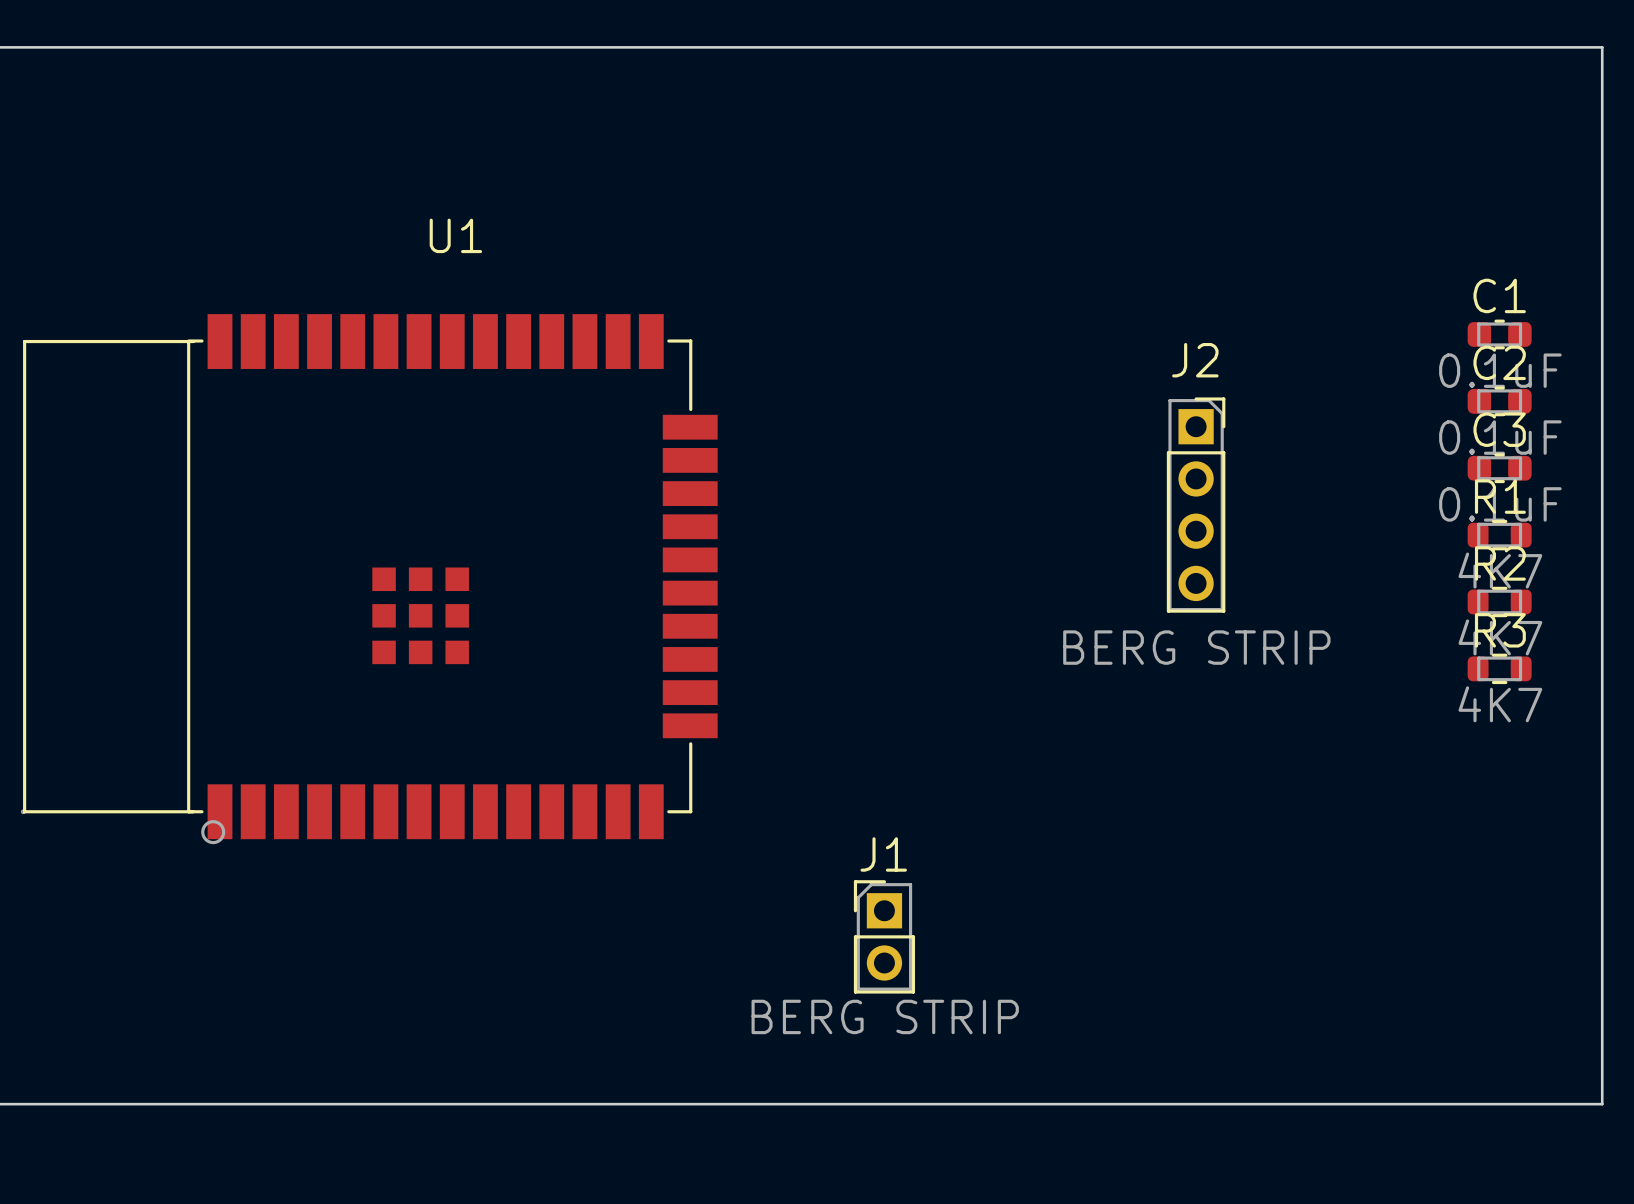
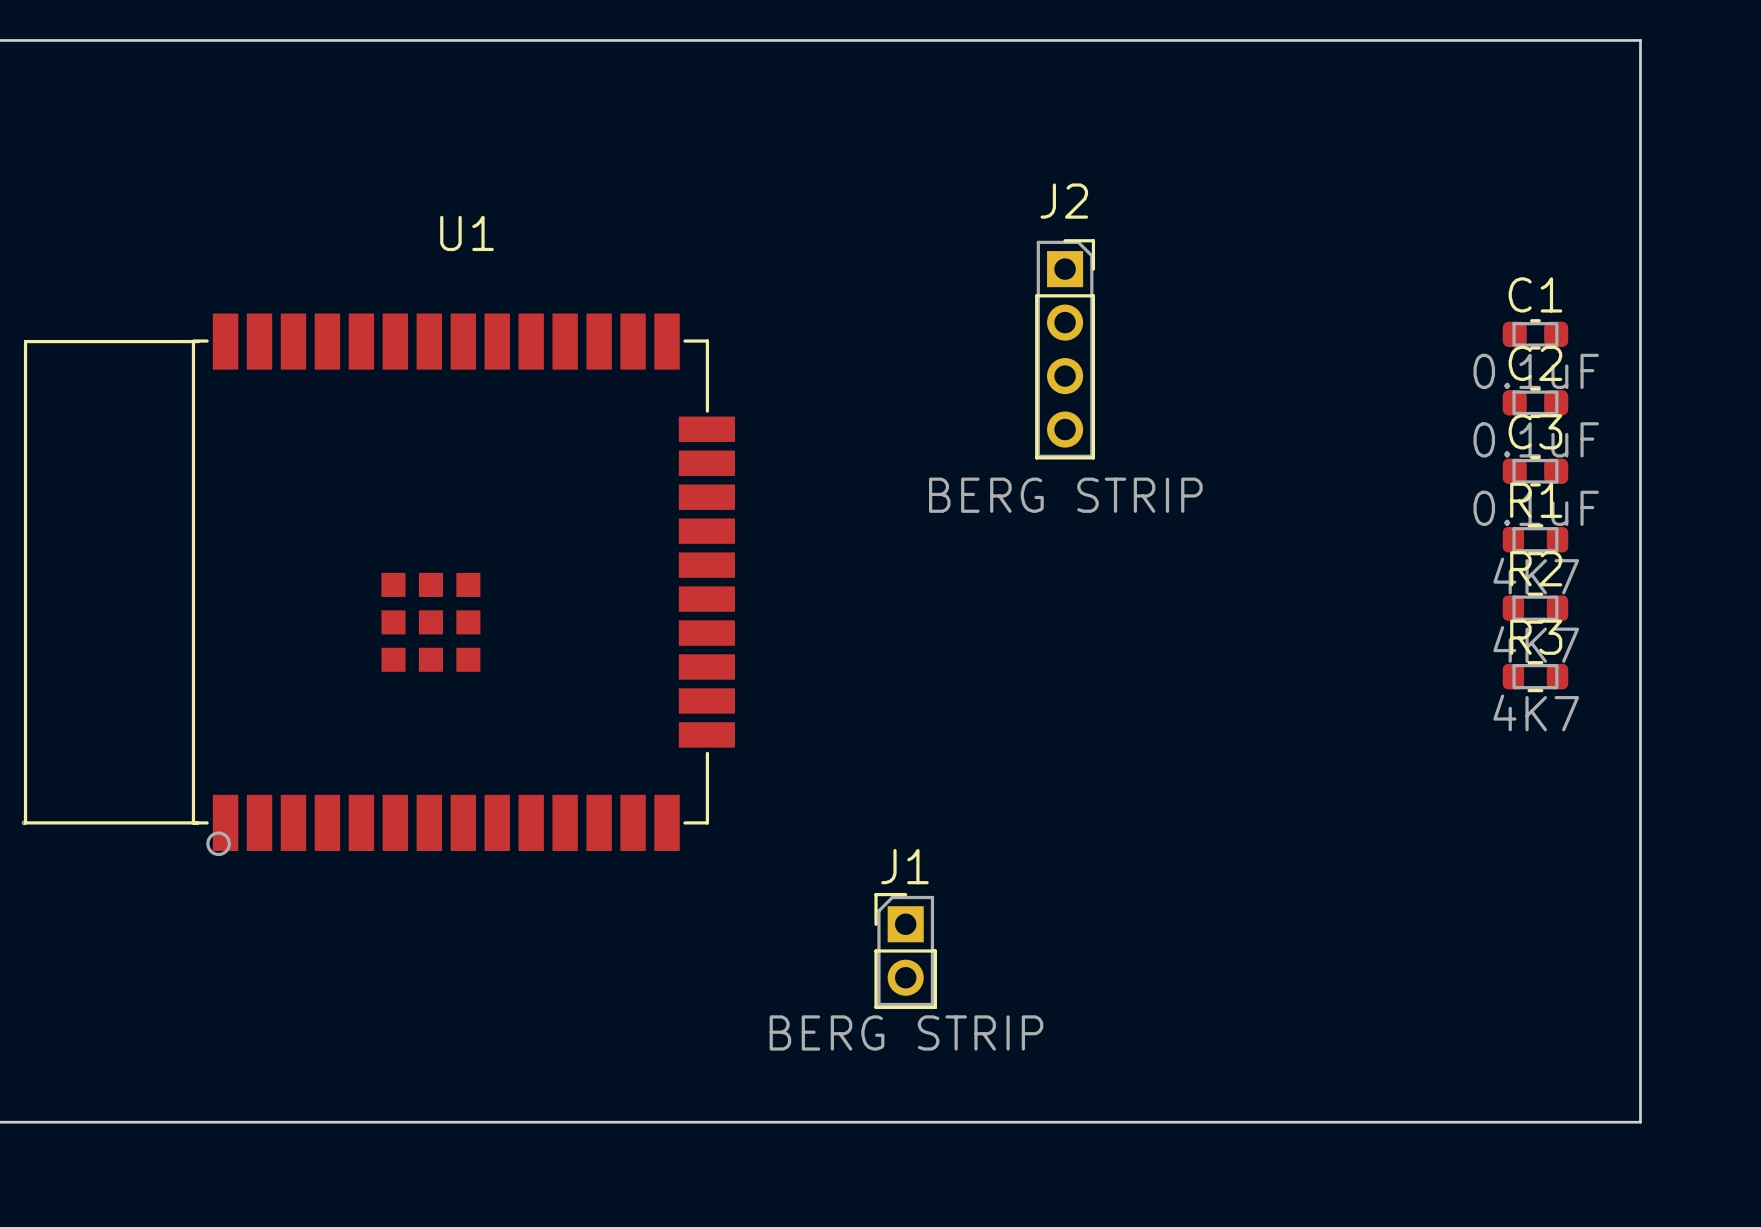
J2 position: (1196, 505) -> (1065, 349)

